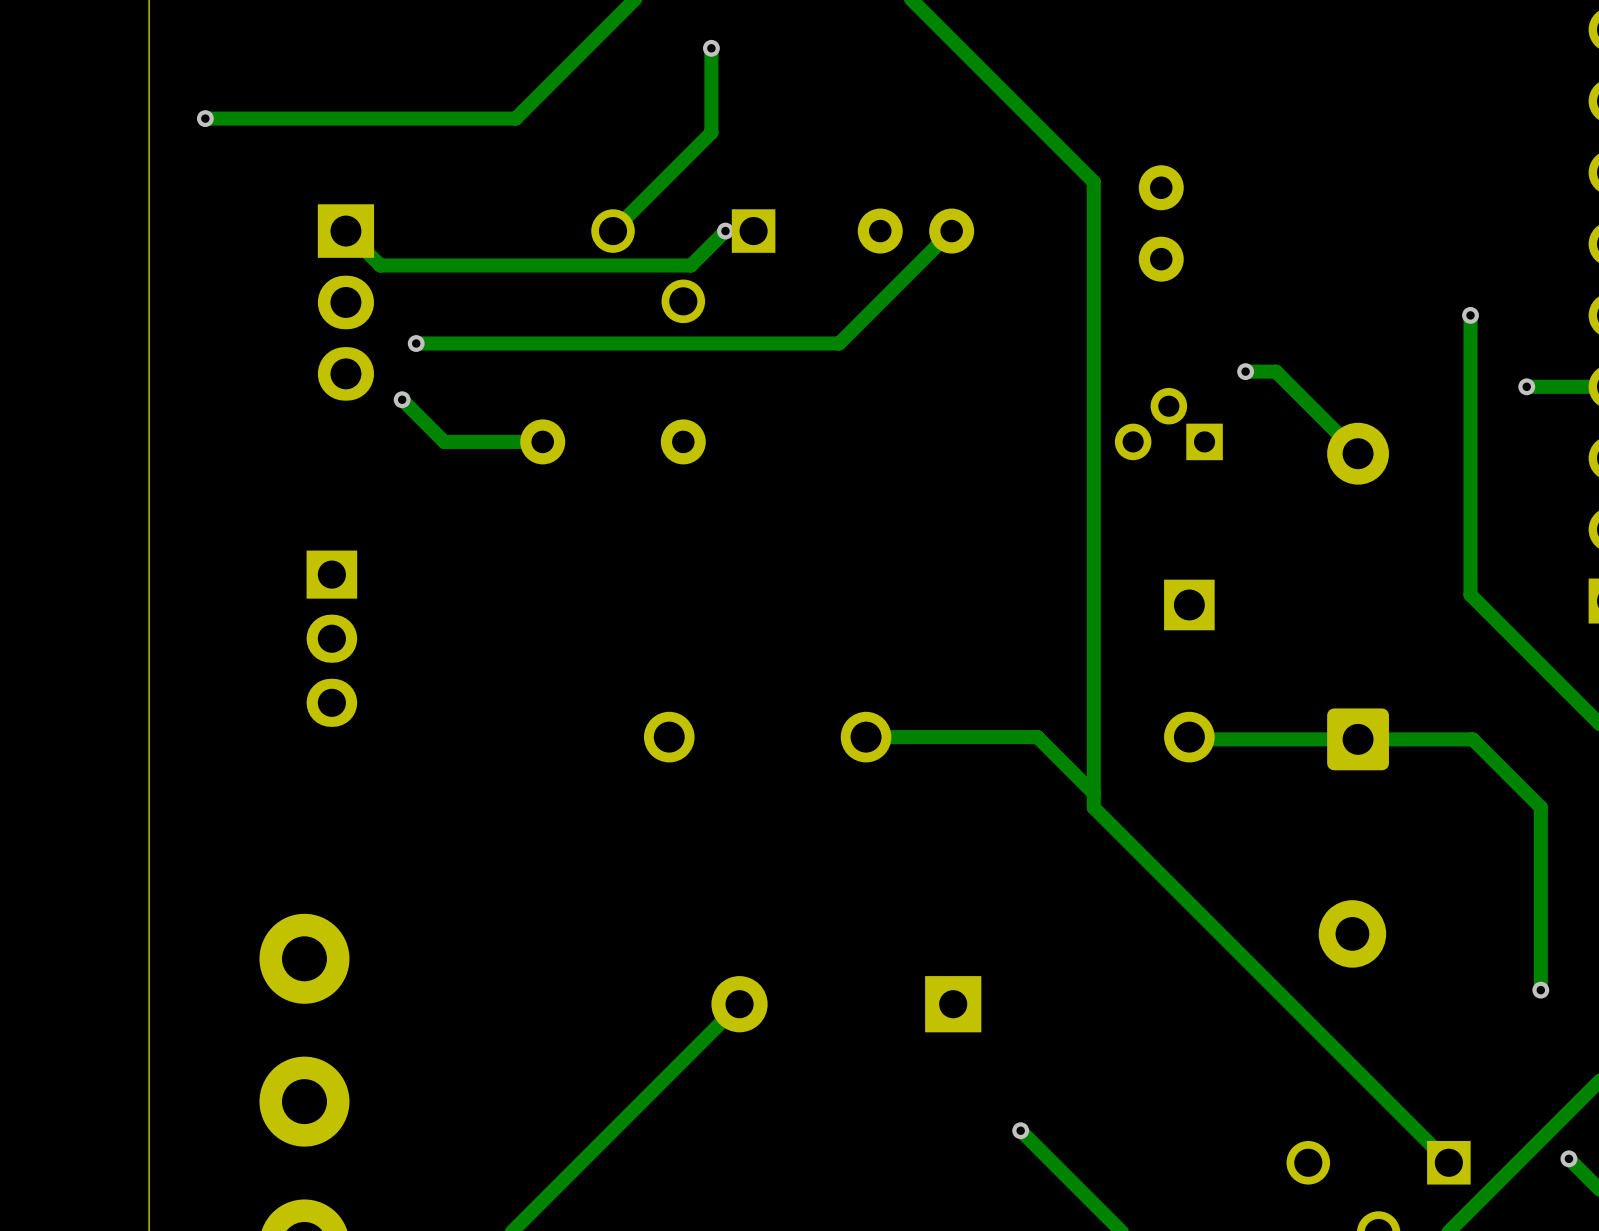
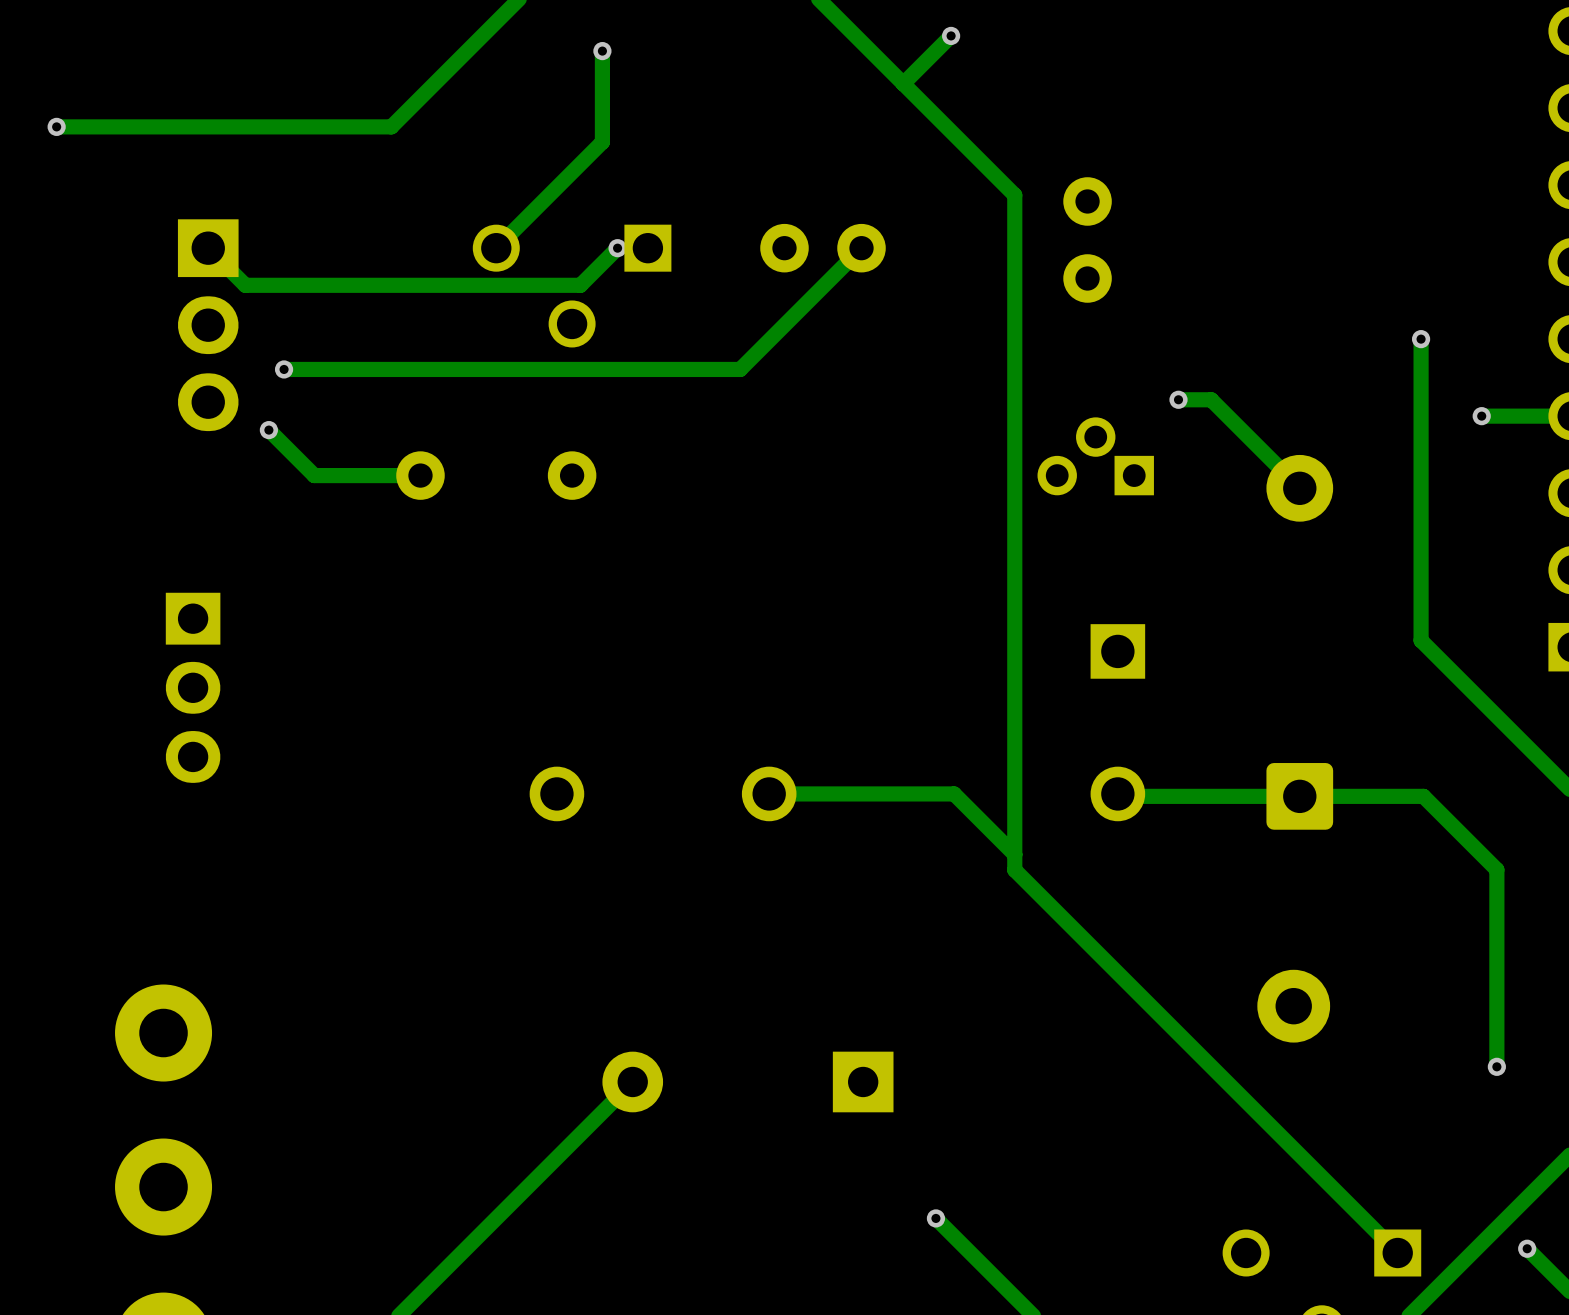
track: none -> (951, 35) (903, 83)
via: none -> (951, 35)

